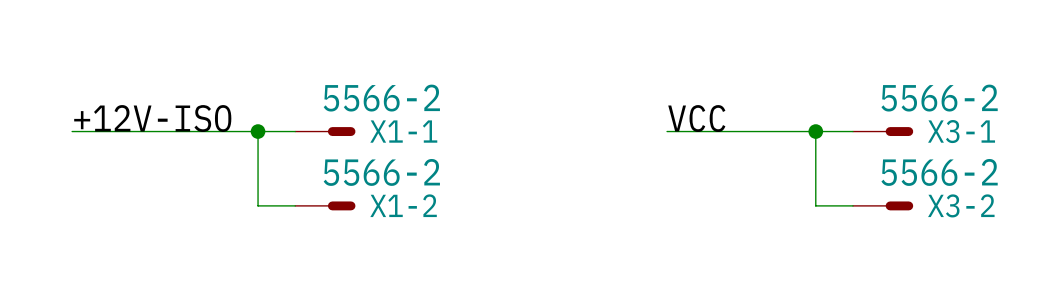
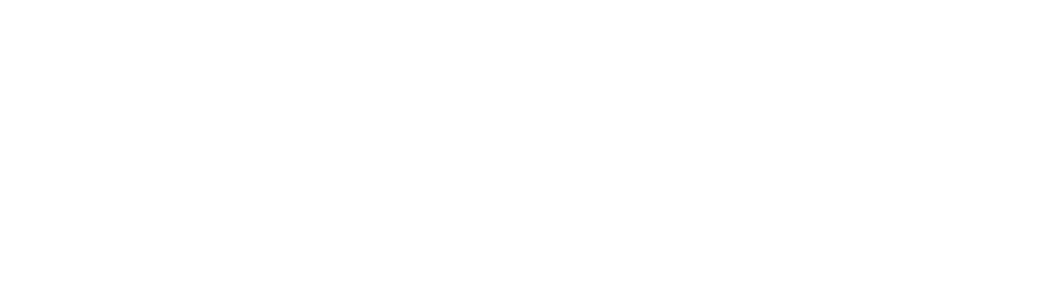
label: +12V-ISO (152, 118) -> none
label: VCC (696, 118) -> none
wire: (72, 131) (295, 131) -> none
wire: (258, 131) (258, 205) (295, 205) -> none
junction: (258, 131) -> none
X1-1: 5566-2 (325, 131) -> none
wire: (667, 131) (852, 131) -> none
wire: (815, 131) (815, 205) (852, 205) -> none
junction: (815, 131) -> none
X3-1: 5566-2 (883, 131) -> none
X1-2: 5566-2 (325, 205) -> none
X3-2: 5566-2 (883, 205) -> none

